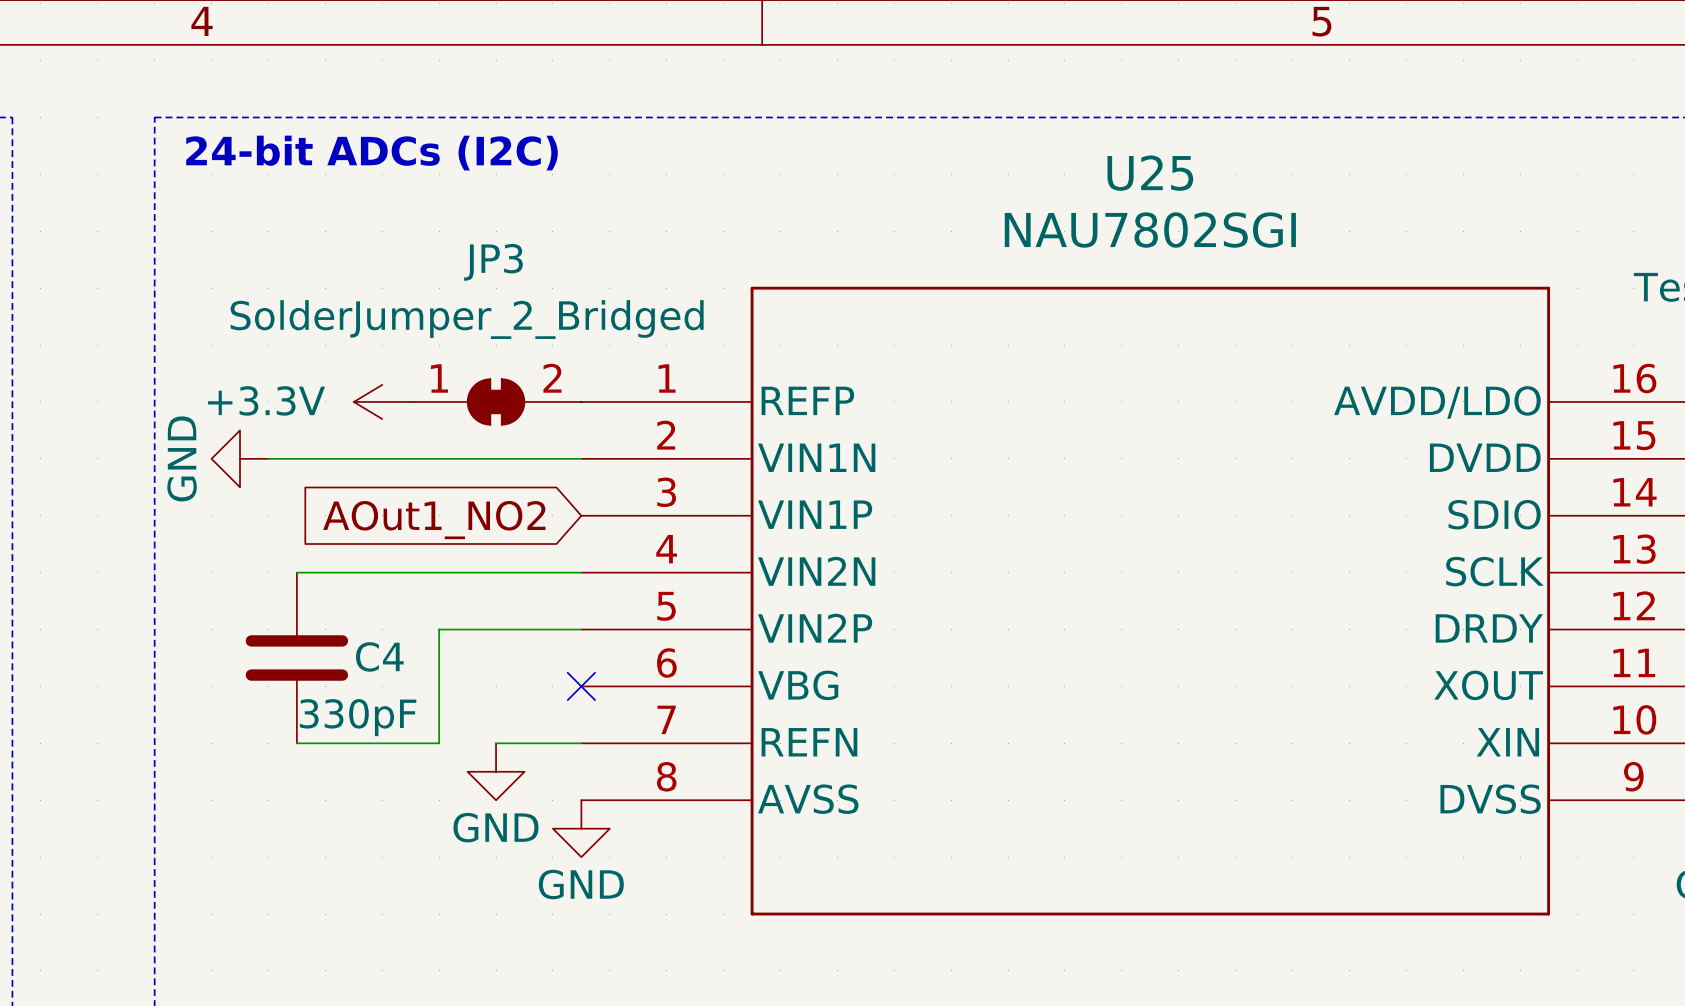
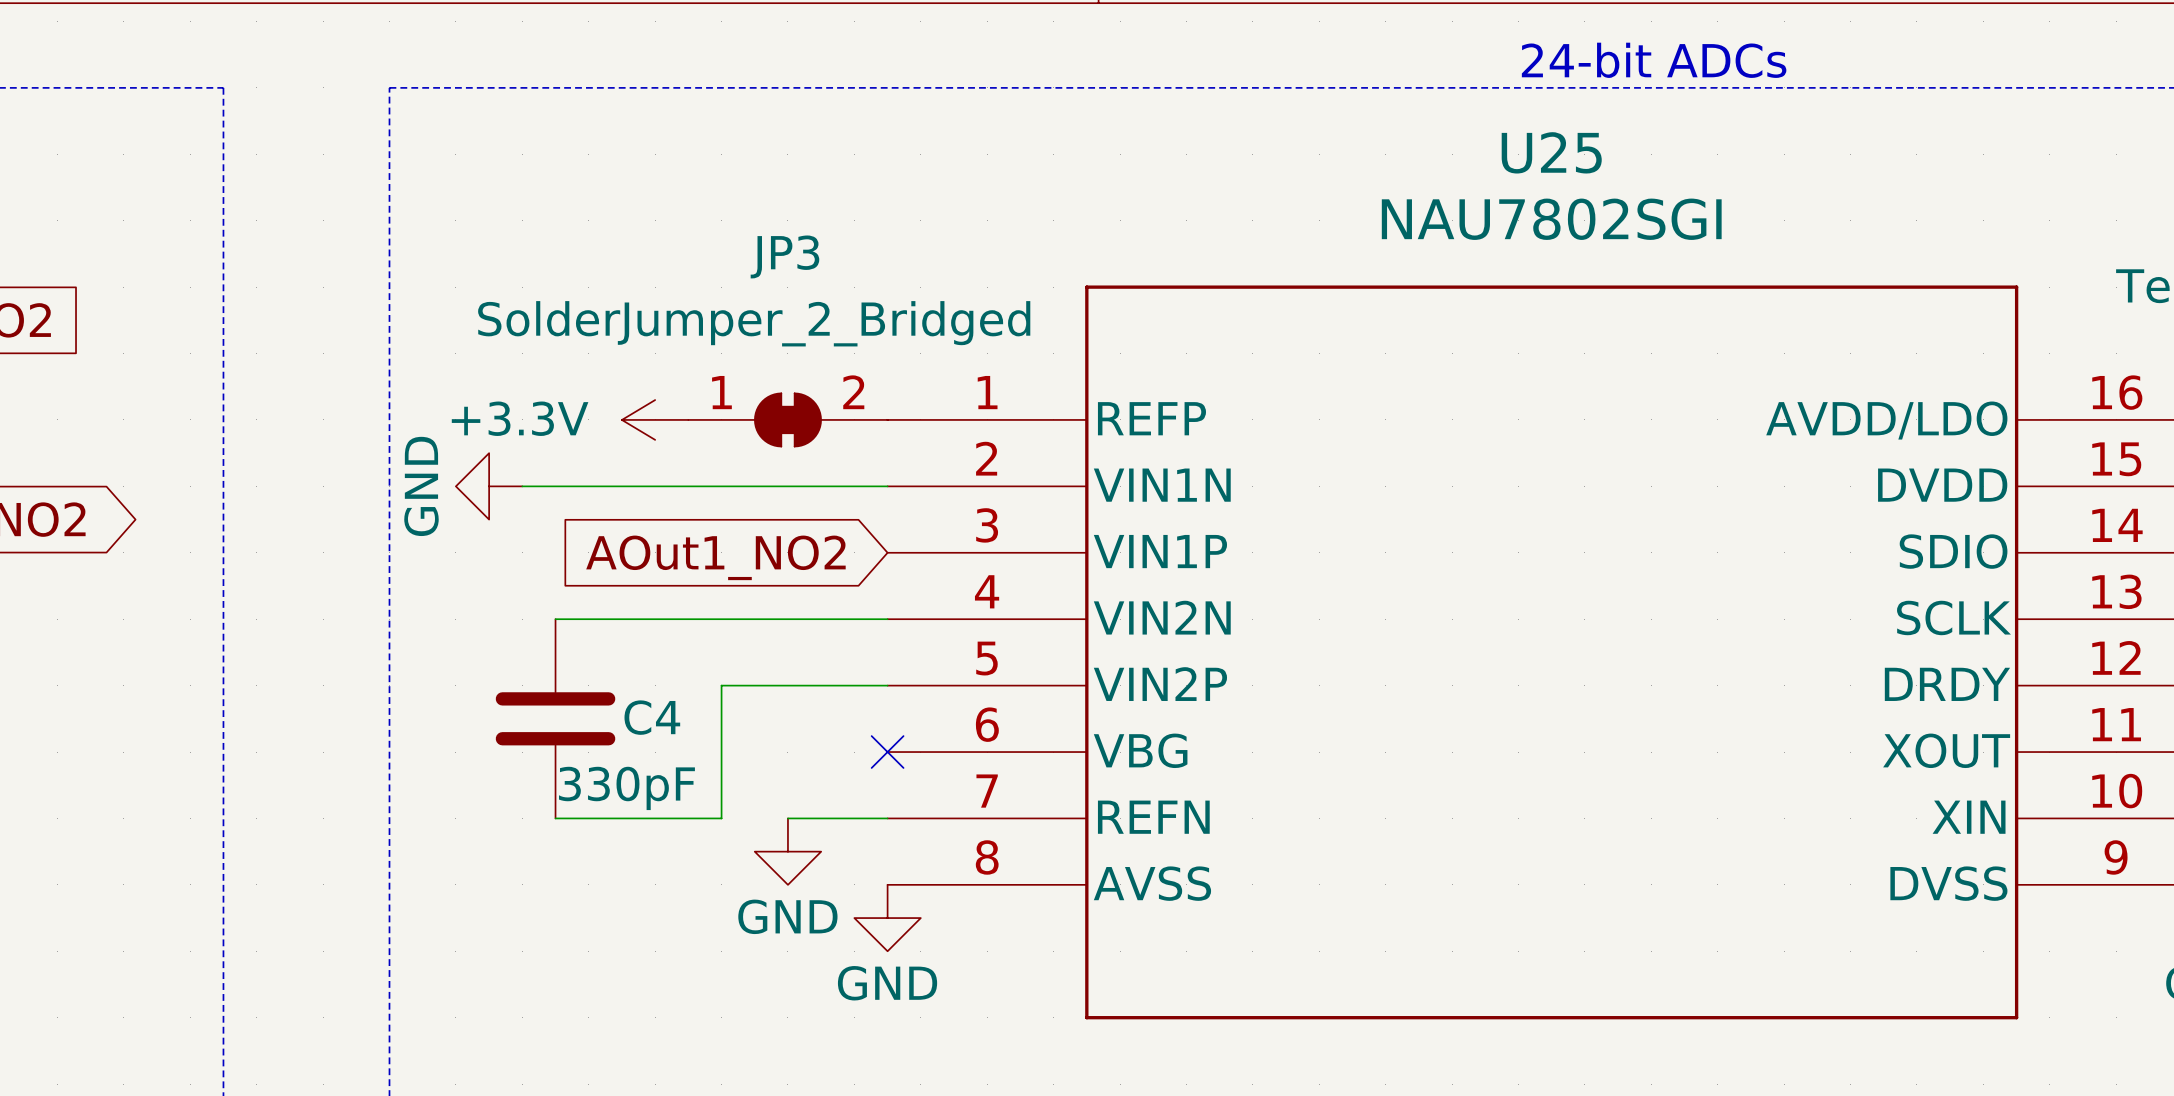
text: none -> 24-bit ADCs (1654, 60)
text: 24-bit ADCs (I2C) (372, 153) -> none

